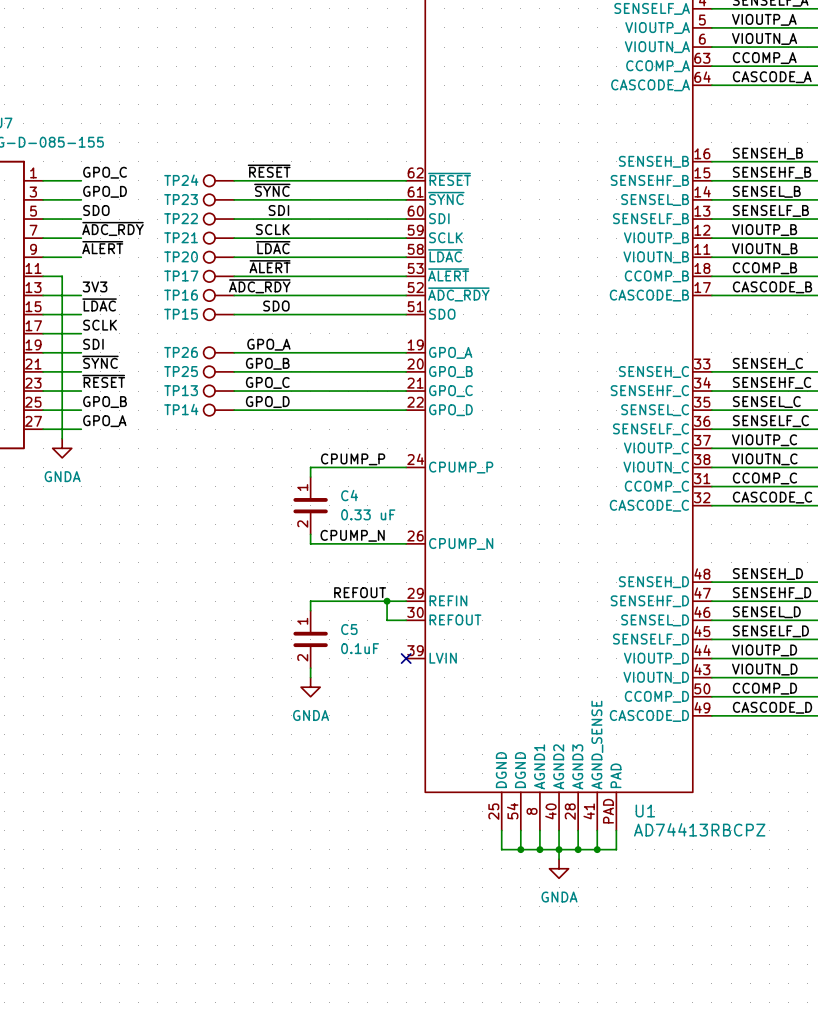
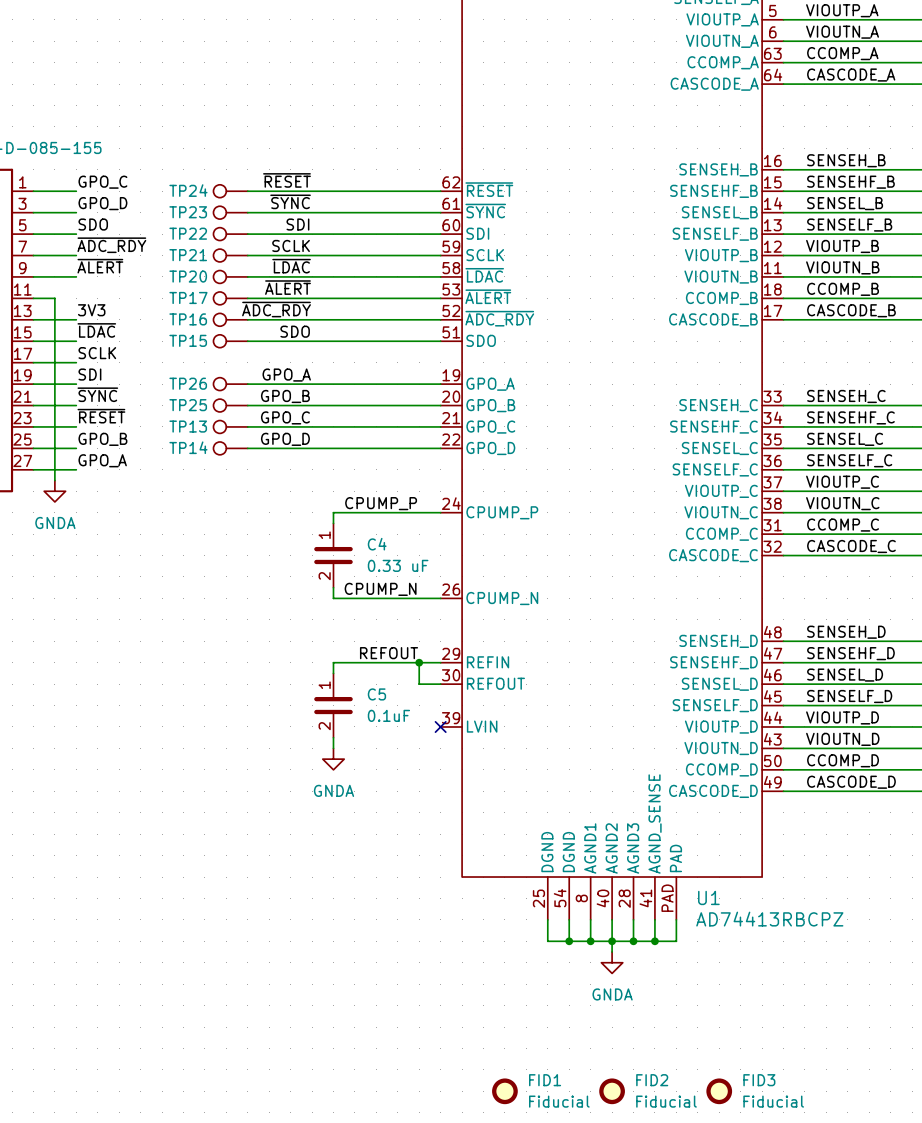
FID1: none -> Fiducial (504, 1091)
FID2: none -> Fiducial (612, 1091)
FID3: none -> Fiducial (719, 1091)

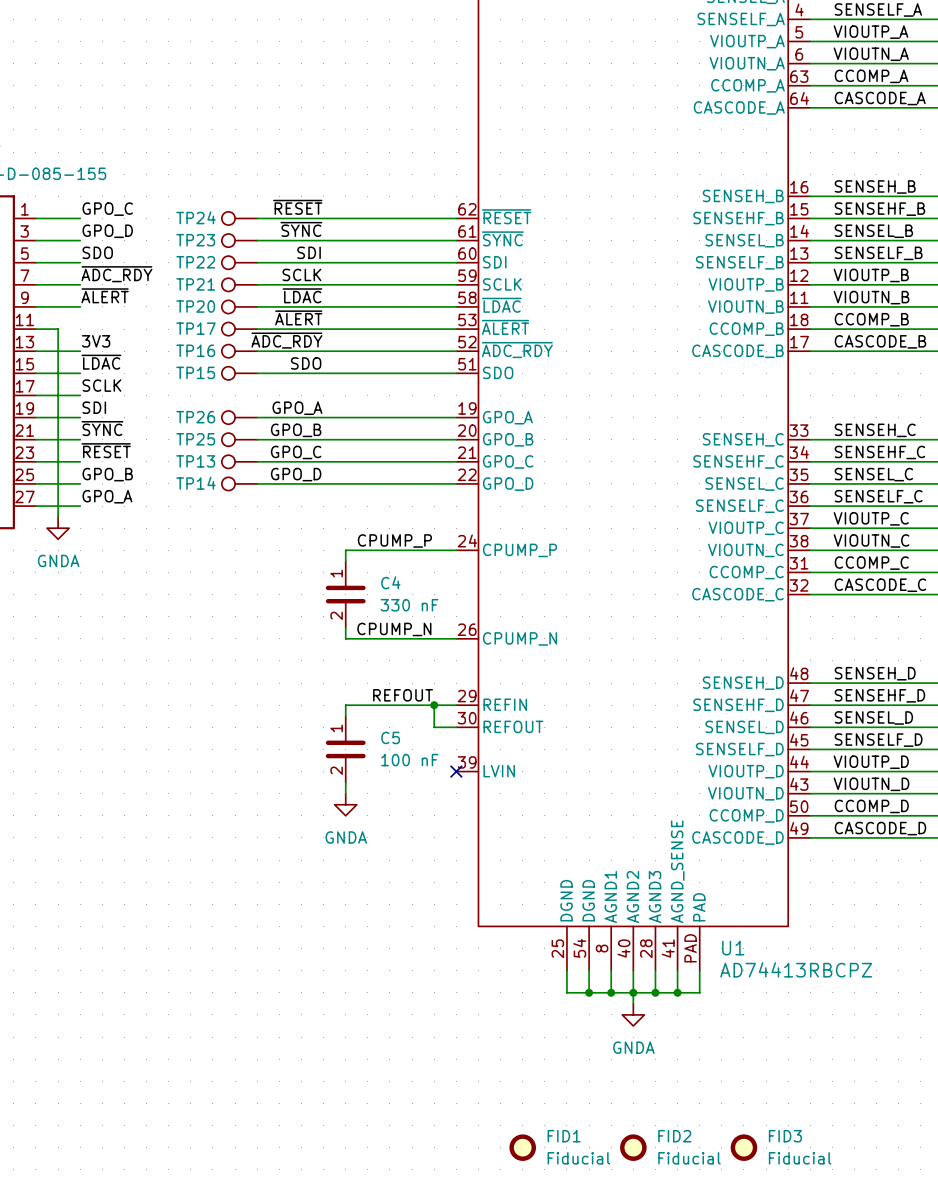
C4 value: 0.33 uF (398, 565) -> 330 nF (409, 605)
C5 value: 0.1uF (388, 715) -> 100 nF (409, 760)

